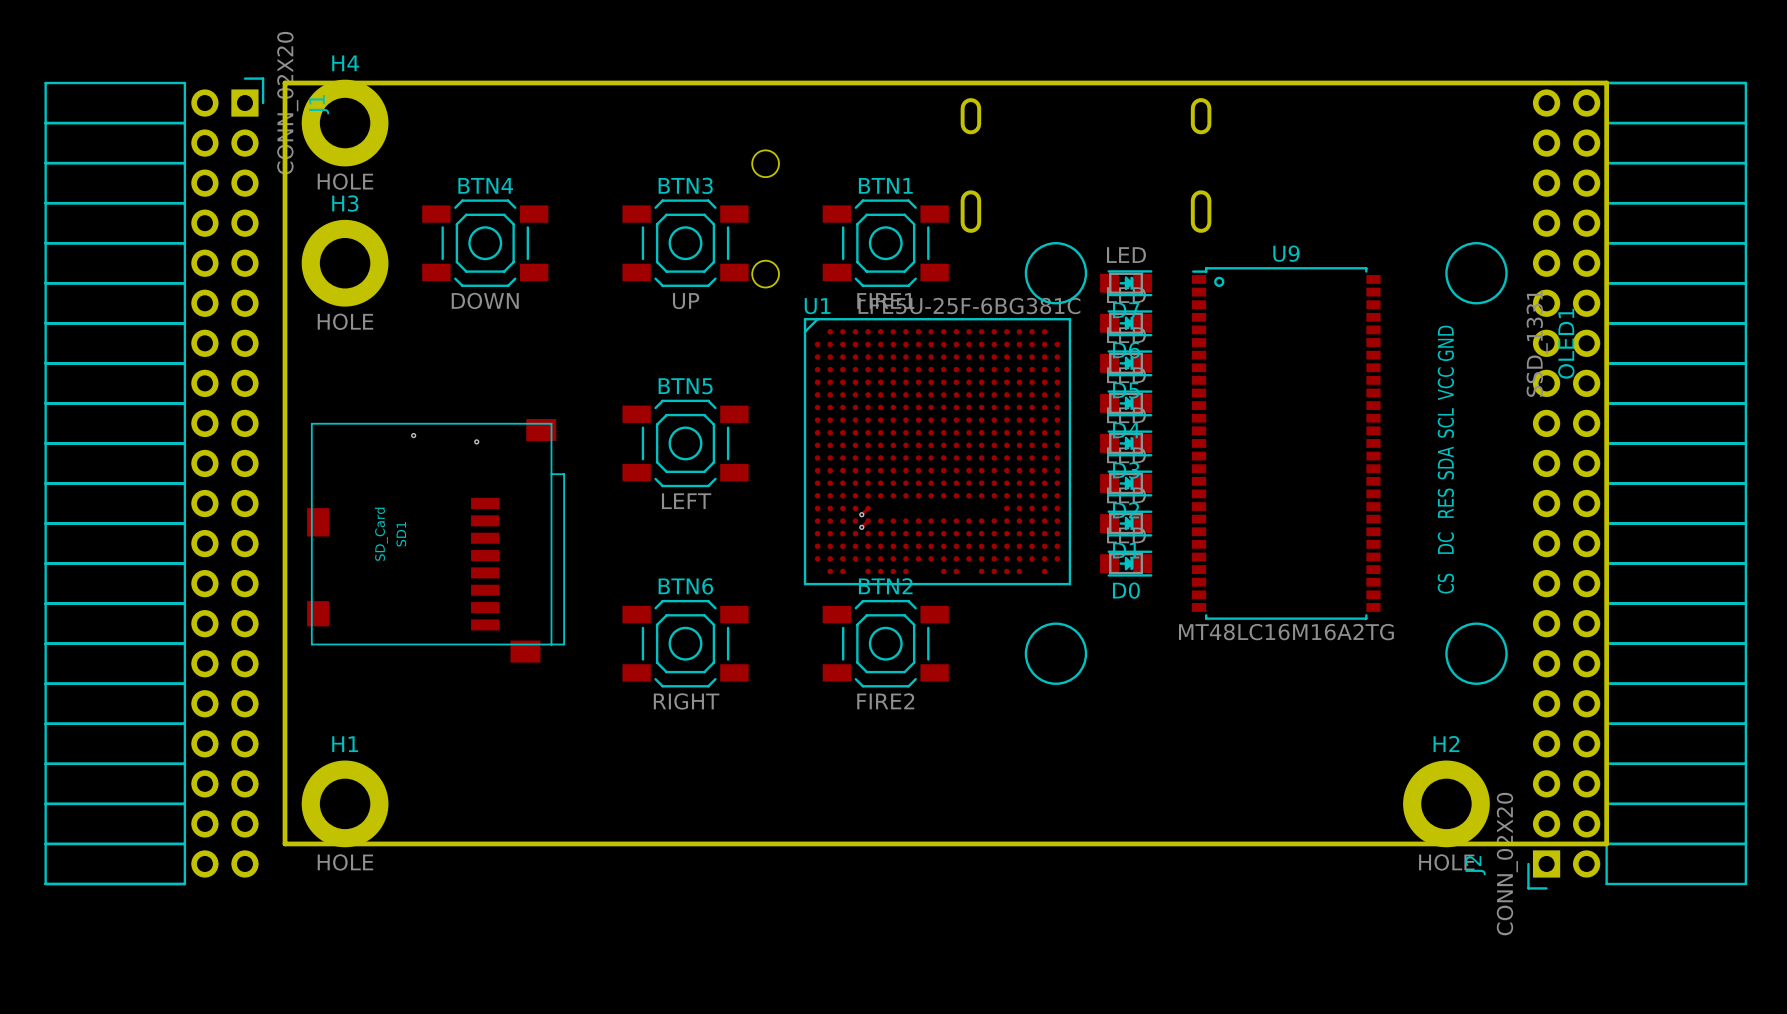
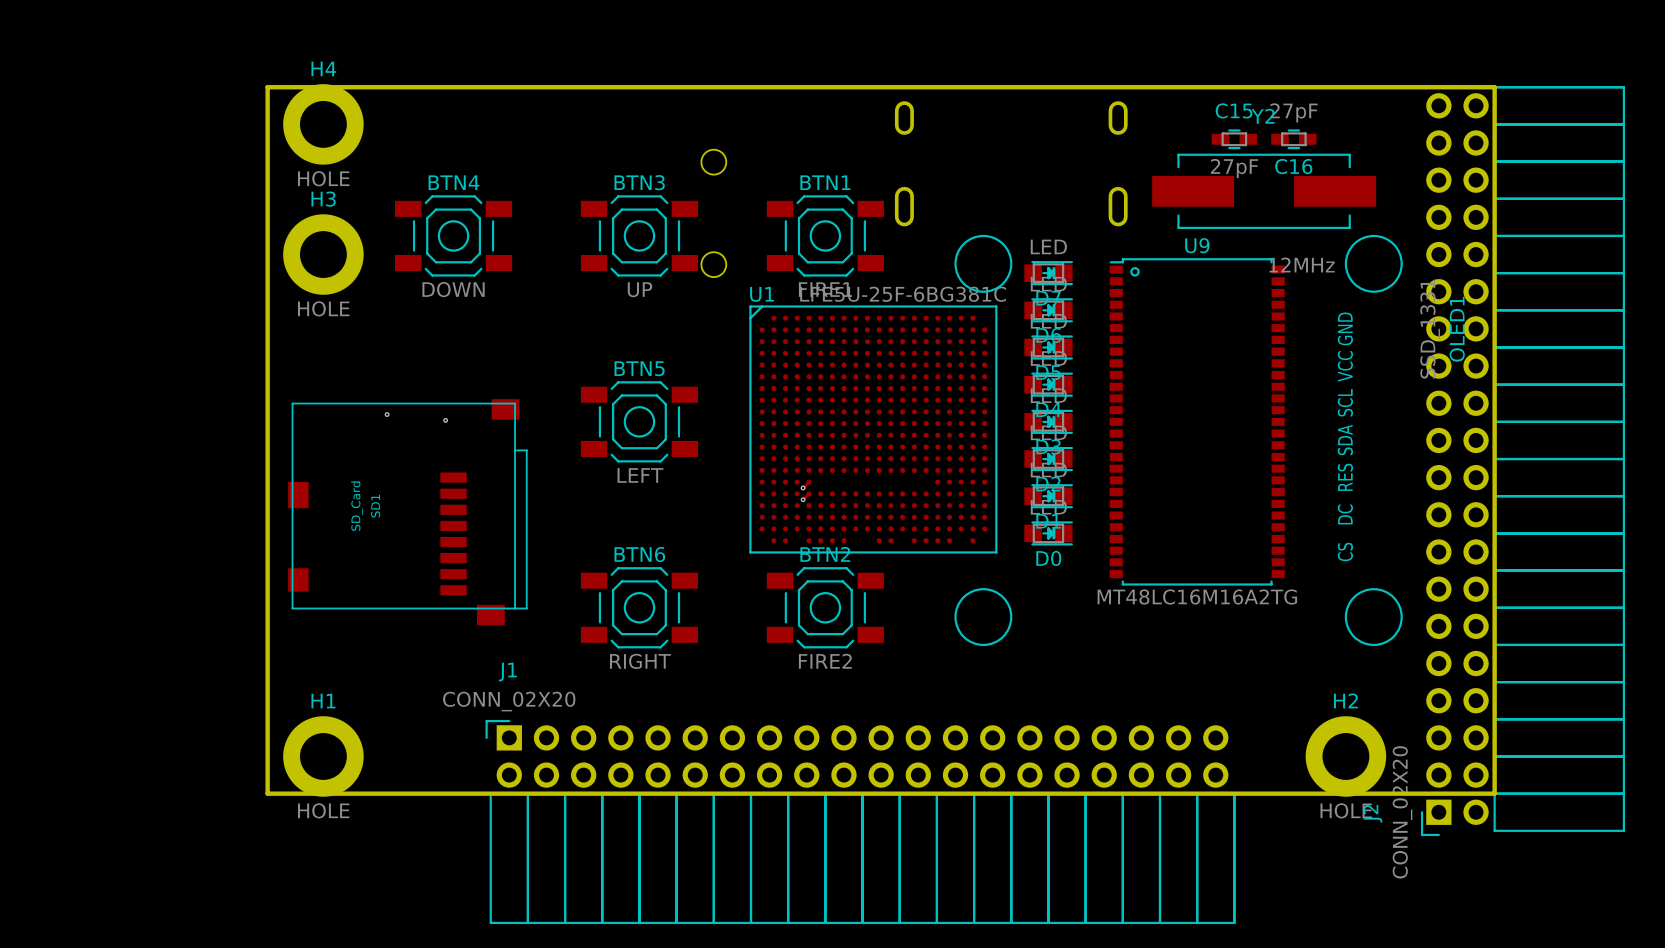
C15: none -> 27pF (1234, 139)
C16: none -> 27pF (1293, 139)
Y2: none -> 12MHz (1264, 191)
J1 rotation: 0° (154, 481) -> 90° counterclockwise (860, 822)
J1 position: (154, 481) -> (860, 822)

